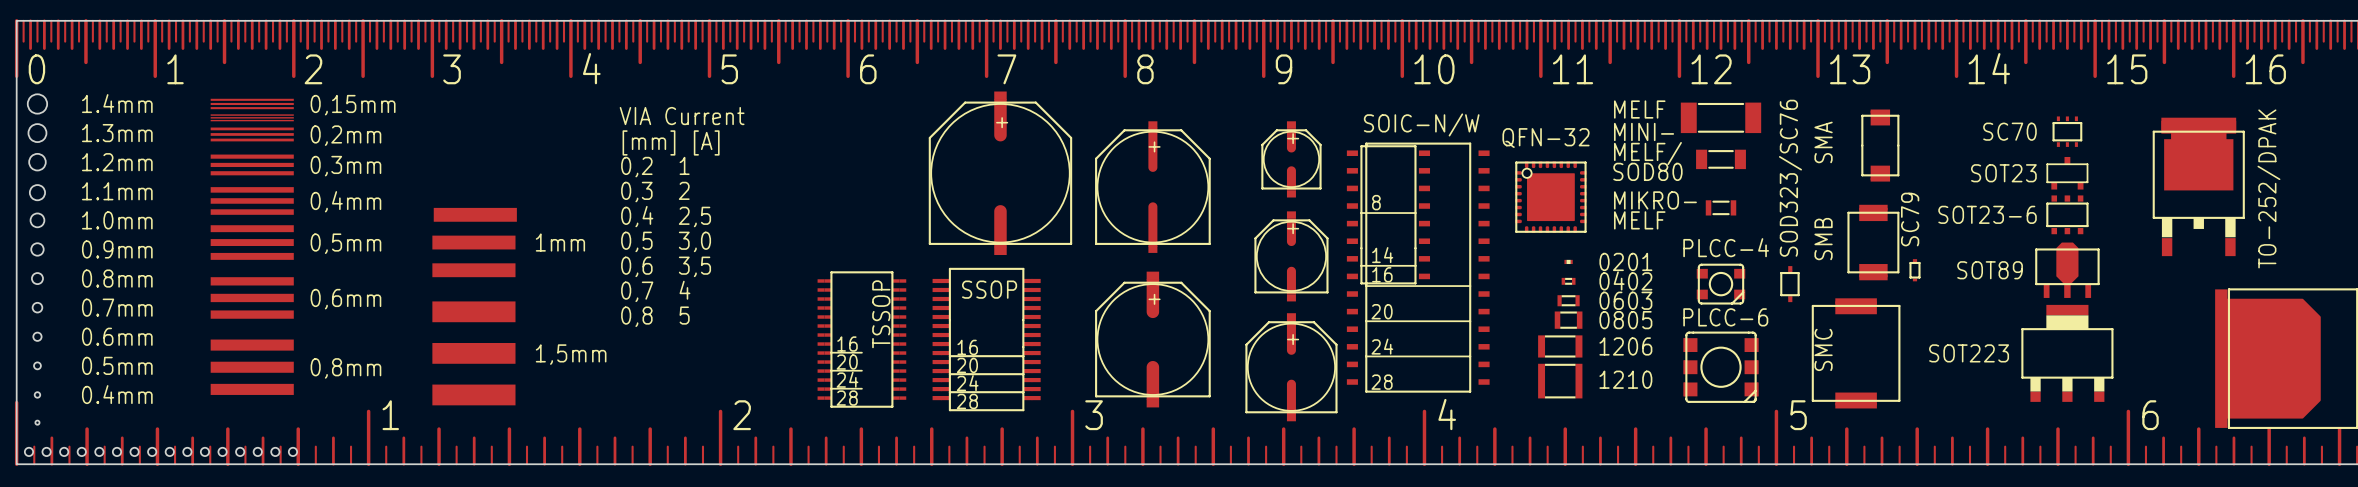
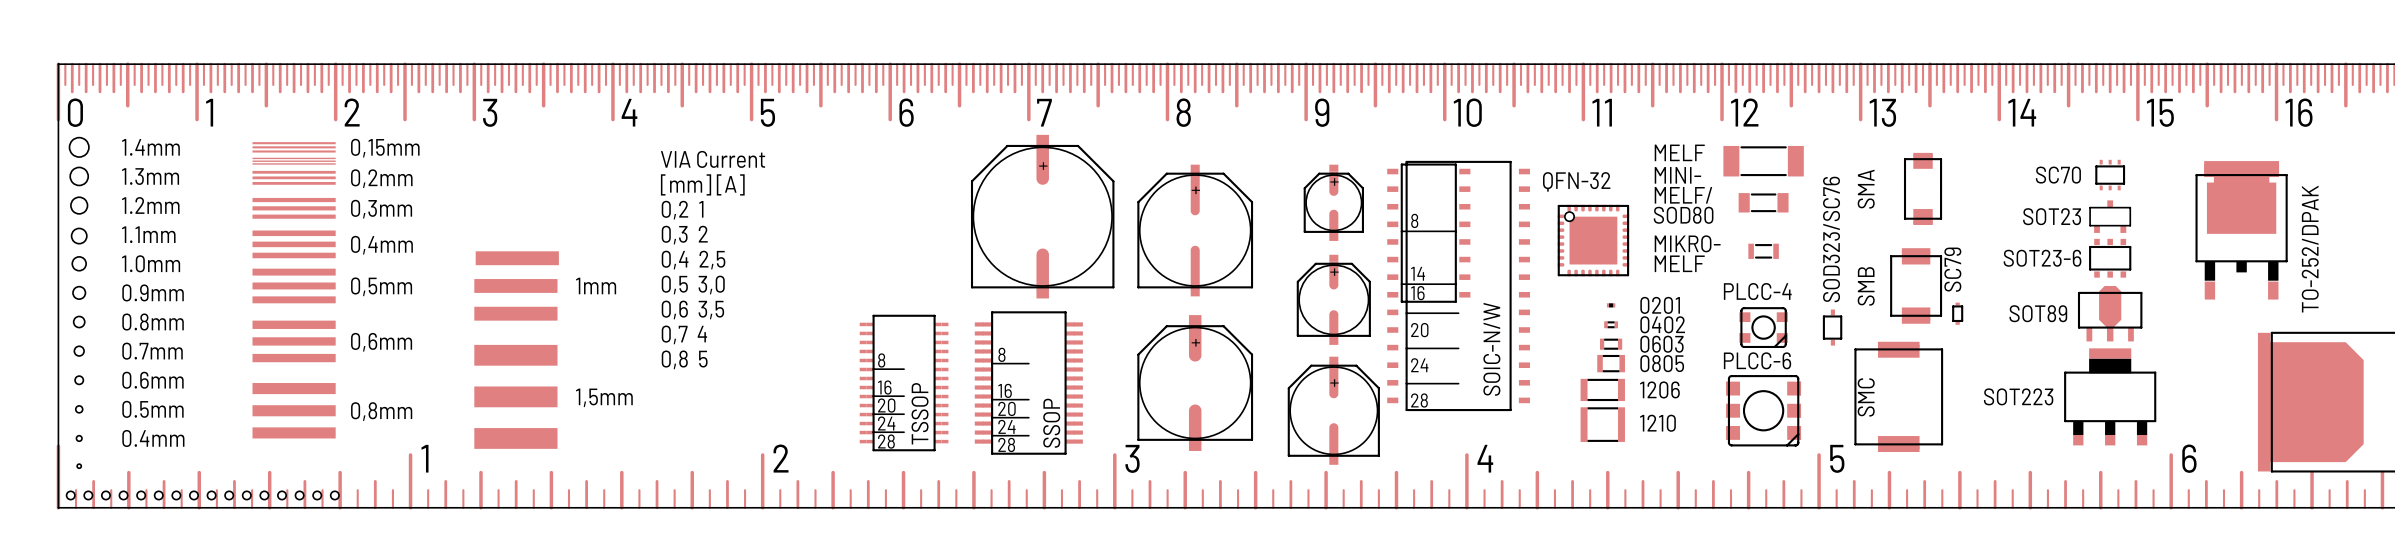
text rotation: 0° (1421, 124) -> 90° counterclockwise (1491, 349)
text position: SOIC-N/W (1421, 124) -> SOIC-N/W (1491, 349)
part: none -> (1458, 285)
part footprint: [932, 267, 1041, 412] -> [974, 311, 1083, 455]
part: (1418, 267) -> none
part footprint: [817, 271, 907, 408] -> [859, 314, 949, 452]
text rotation: 0° (989, 289) -> 90° counterclockwise (1051, 423)
text position: SSOP (989, 289) -> SSOP (1051, 423)
text position: TSSOP (881, 314) -> TSSOP (920, 413)

